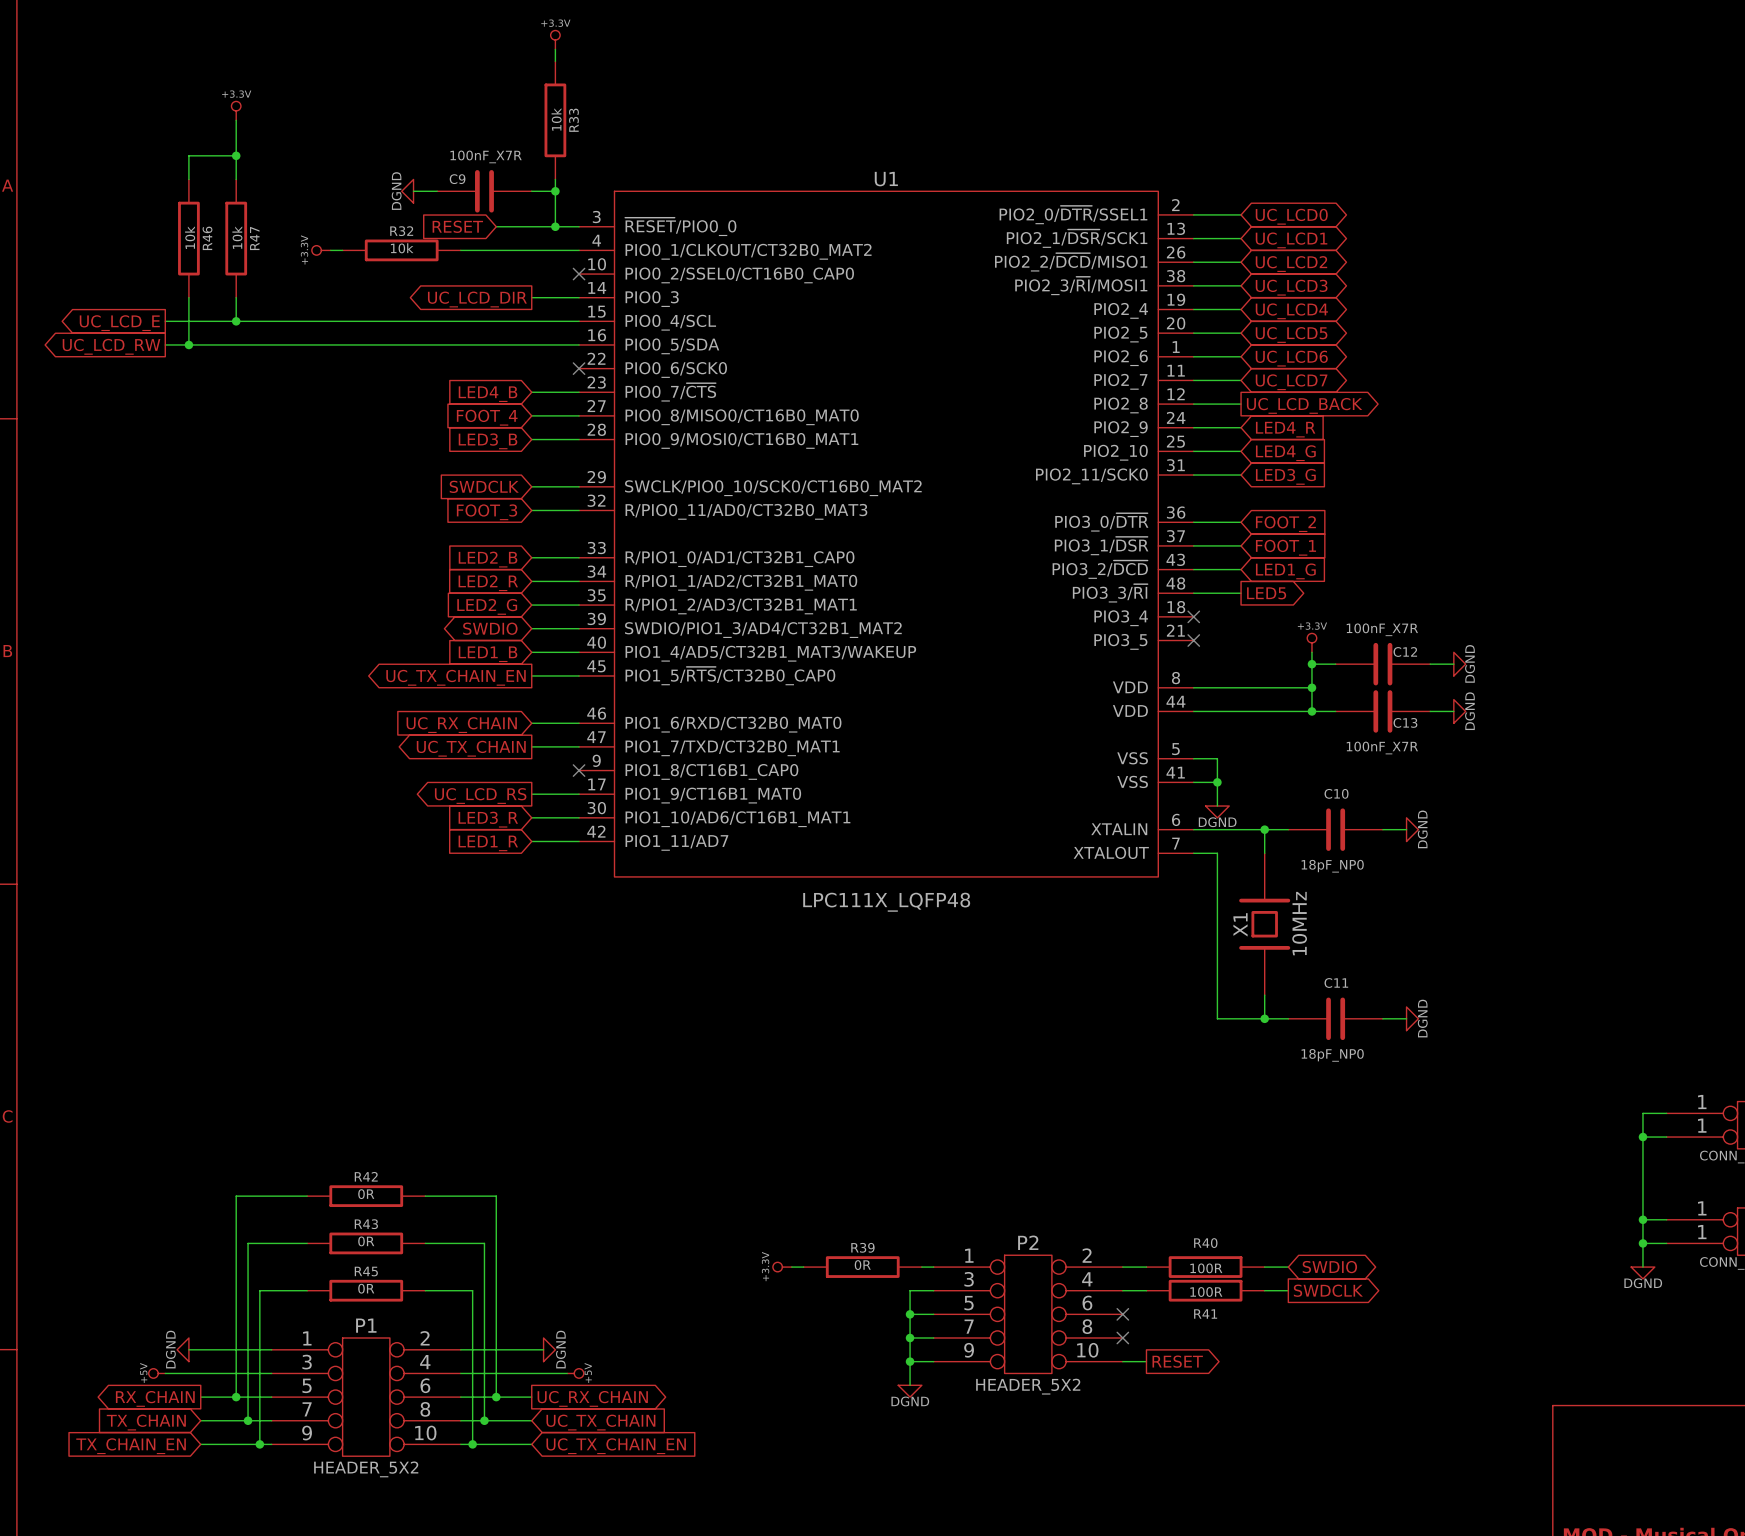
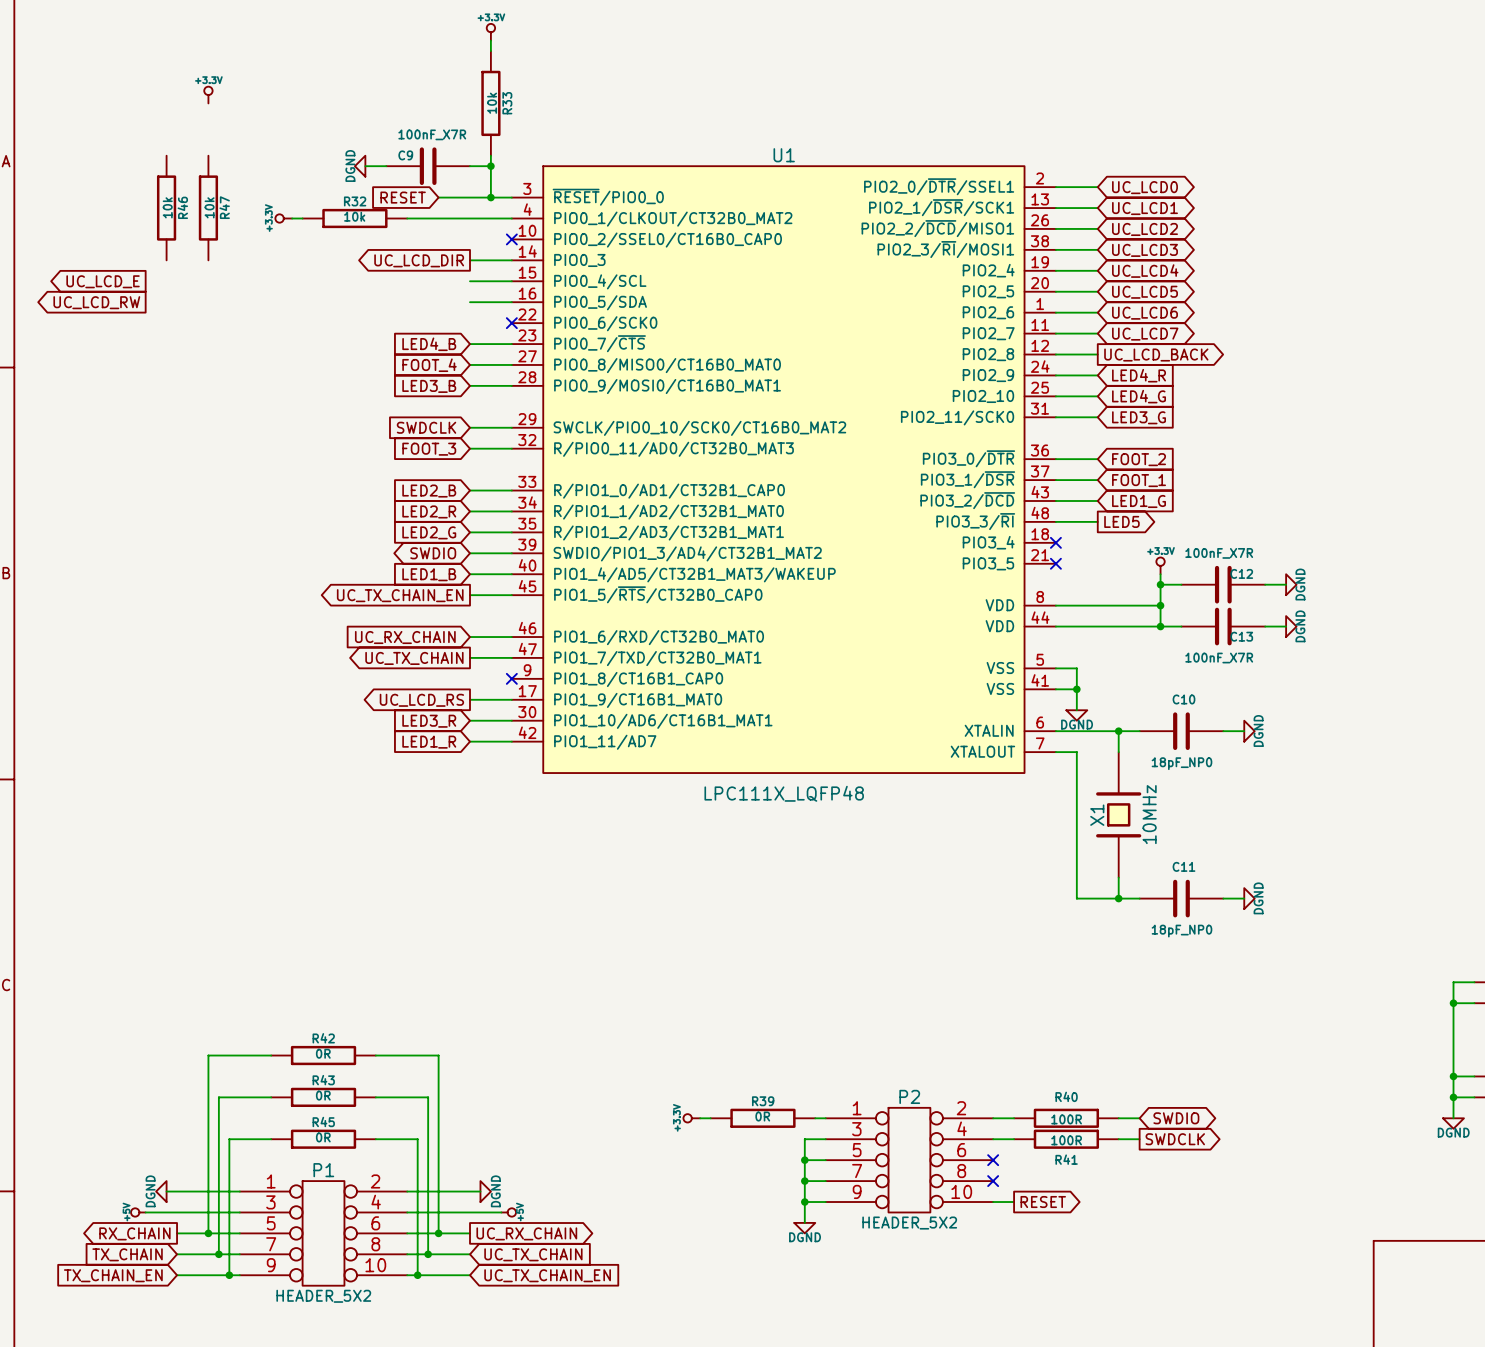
wire: (236, 120) (236, 179) -> none
wire: (236, 155) (188, 155) (188, 179) -> none
junction: (236, 155) -> none
wire: (188, 297) (188, 344) -> none
wire: (236, 297) (236, 321) -> none
wire: (165, 321) (531, 321) -> none
junction: (236, 321) -> none
wire: (165, 344) (531, 344) -> none
junction: (188, 344) -> none

